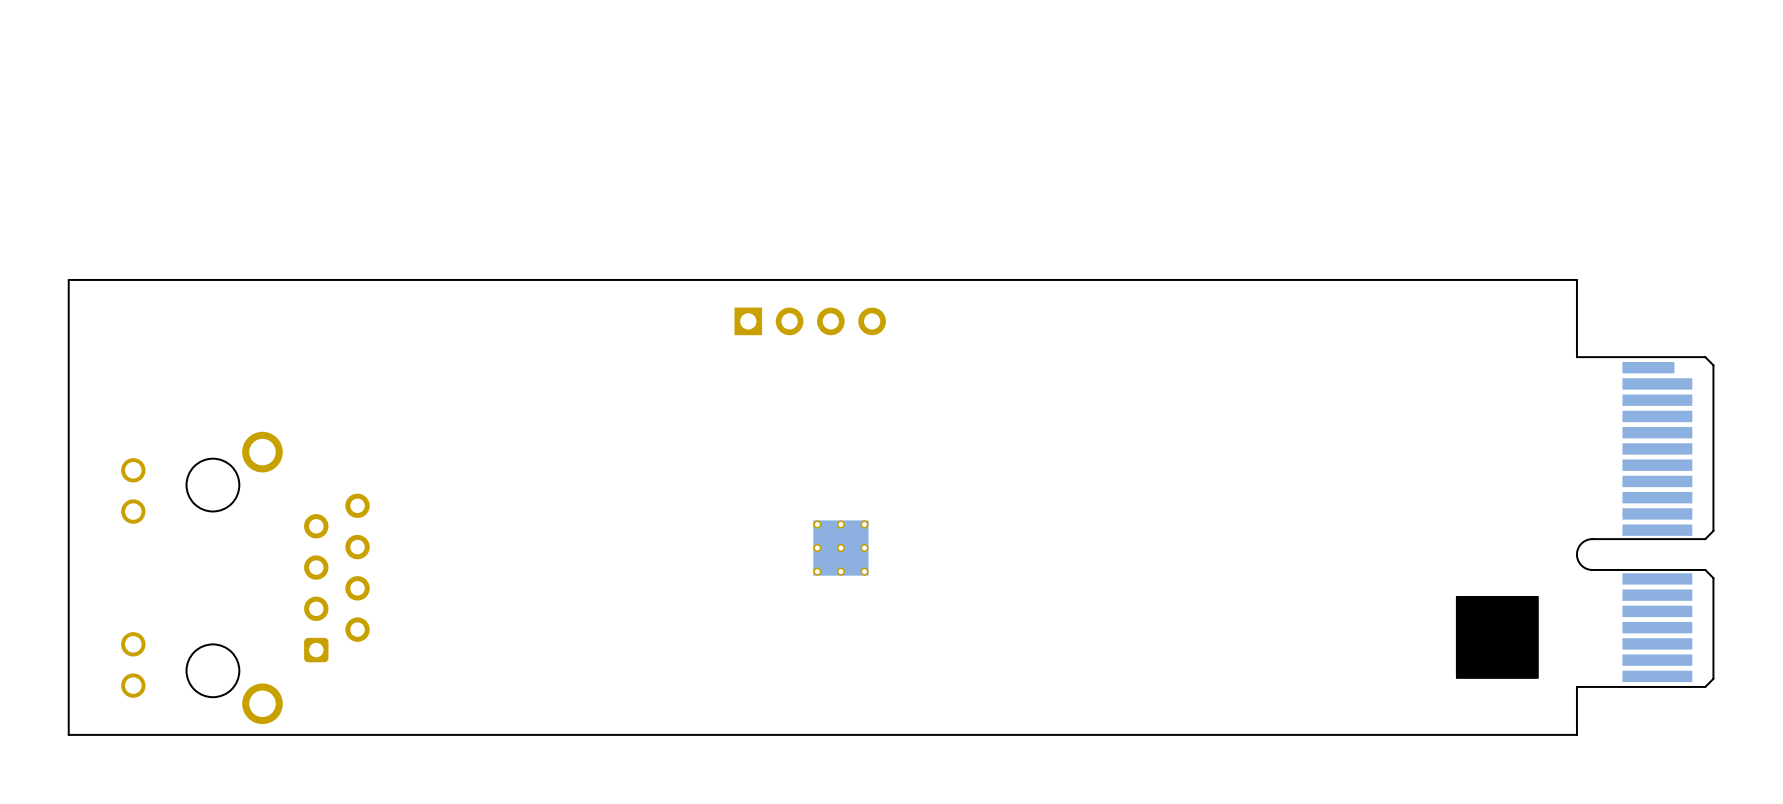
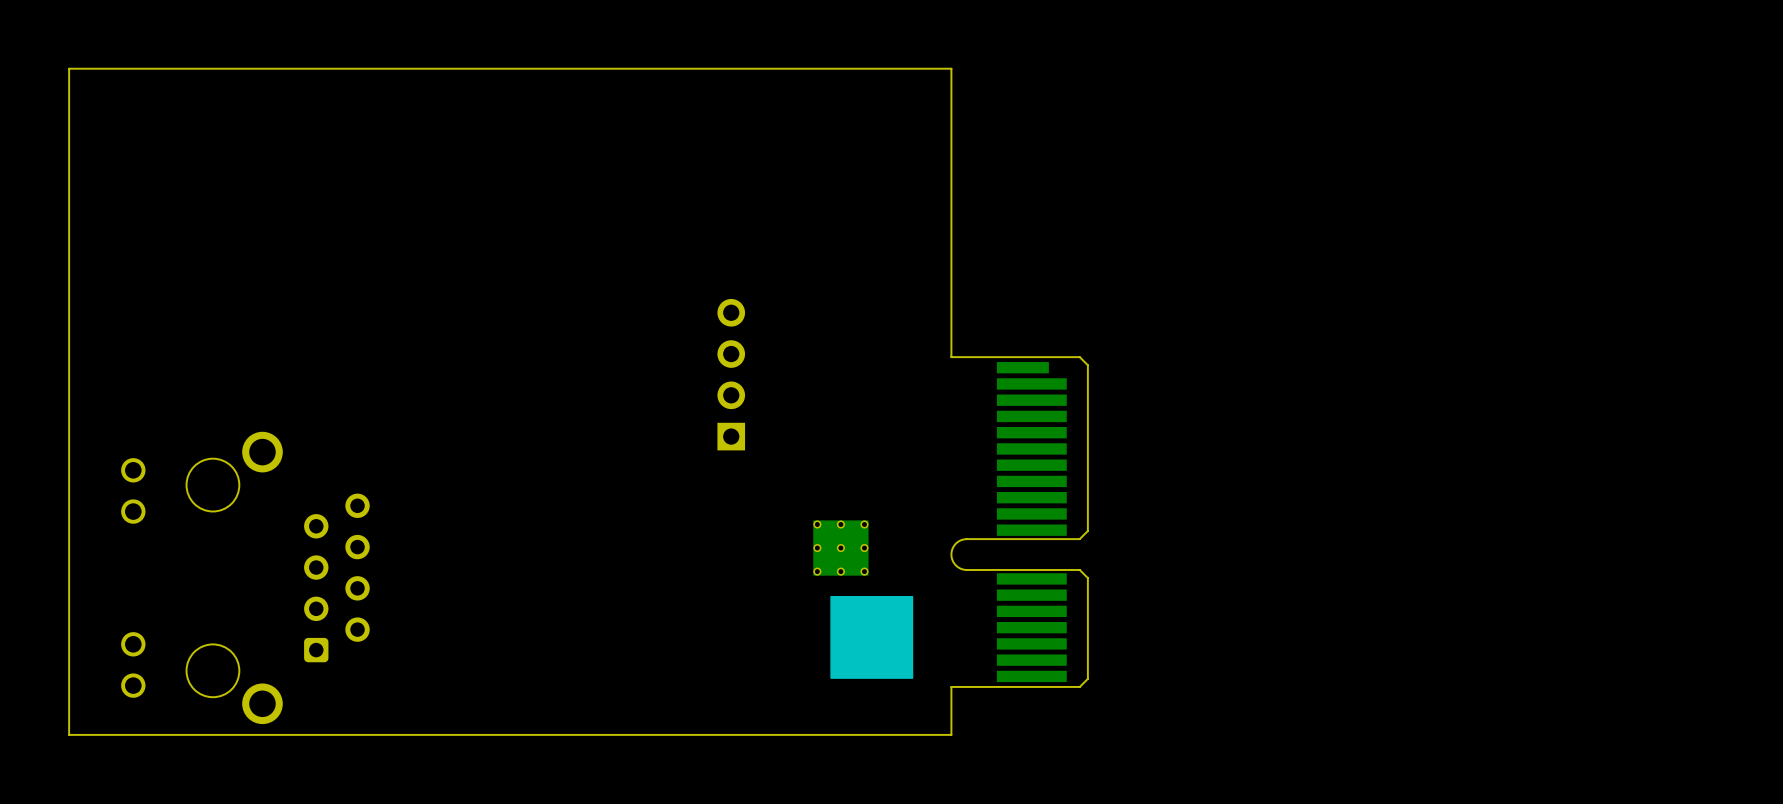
part rotation: 0° (810, 321) -> 90° counterclockwise (731, 374)
part position: (810, 321) -> (731, 374)
board edge: (1576, 357) (1576, 279) (68, 279) (69, 734) -> (951, 357) (951, 68) (69, 68) (69, 734)
part: none -> (1019, 522)
part: (1645, 522) -> none
drawing: none -> [830, 595, 914, 679]
drawing: [1455, 595, 1539, 679] -> none
board edge: (1576, 686) (1576, 734) (951, 734) -> (951, 686) (951, 734)

